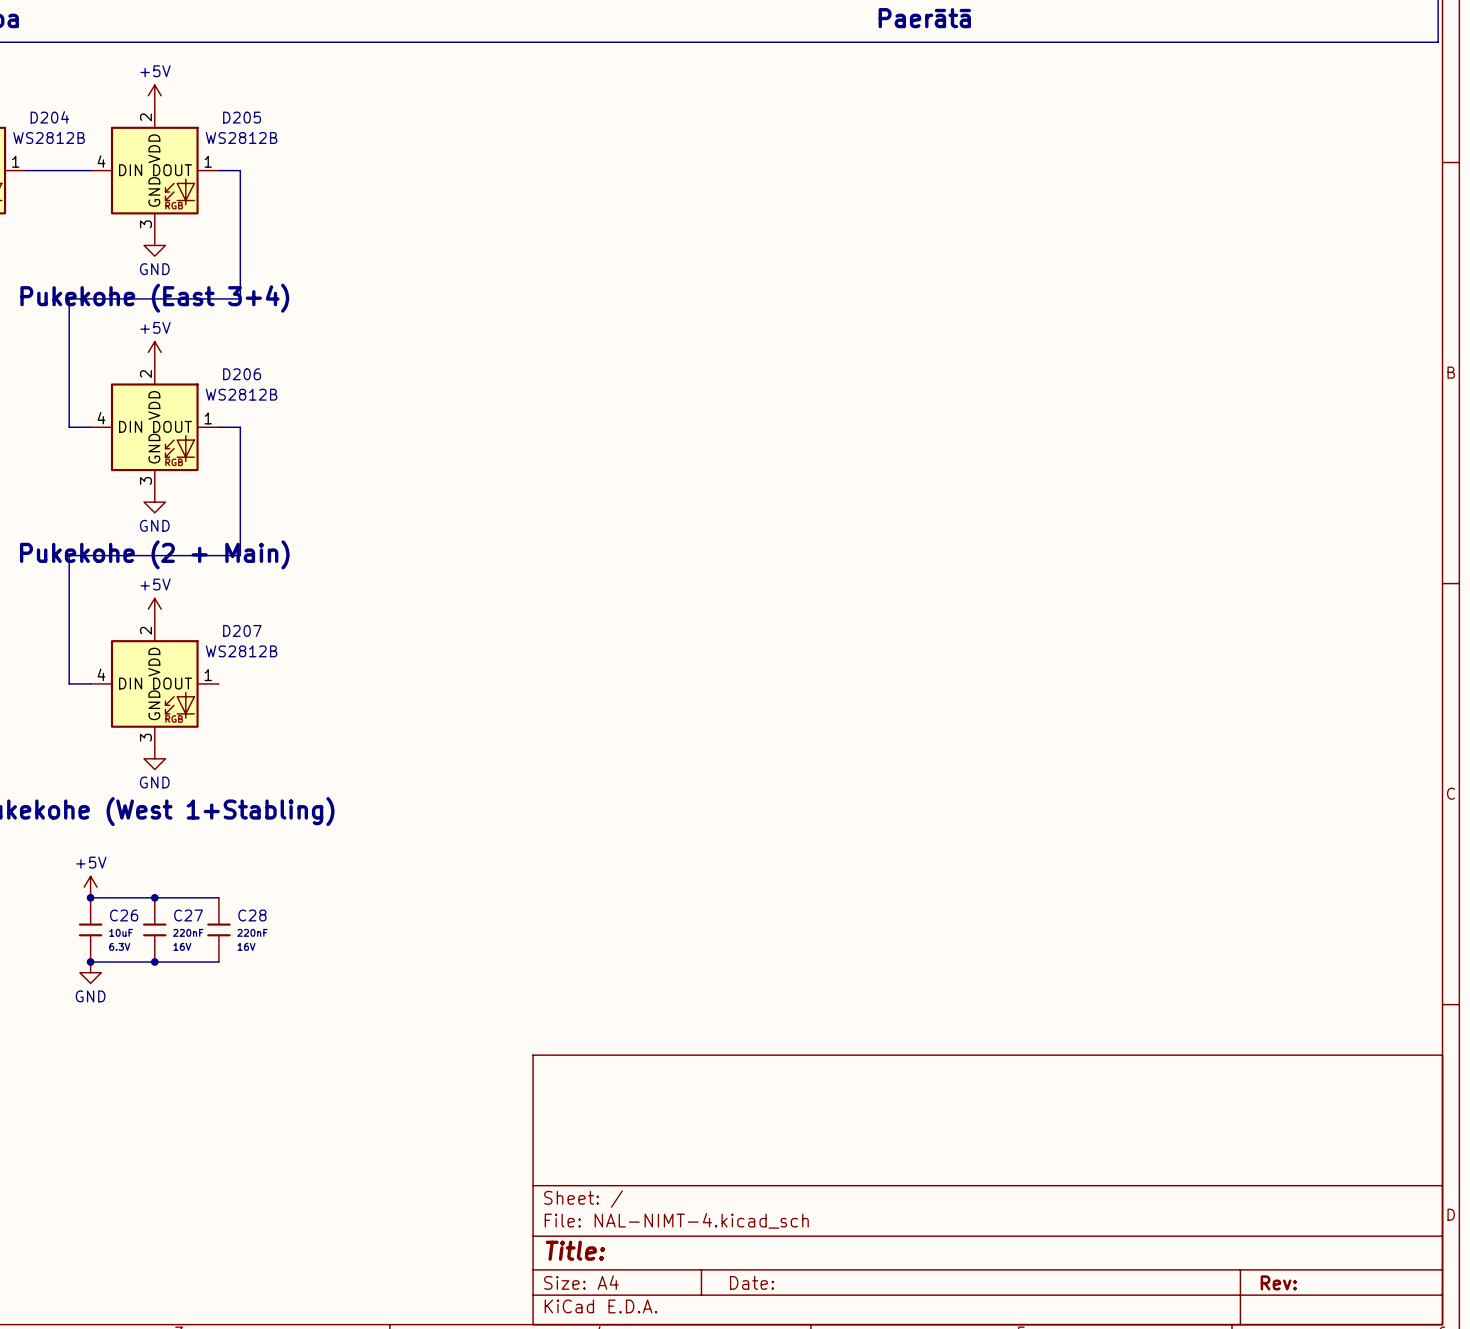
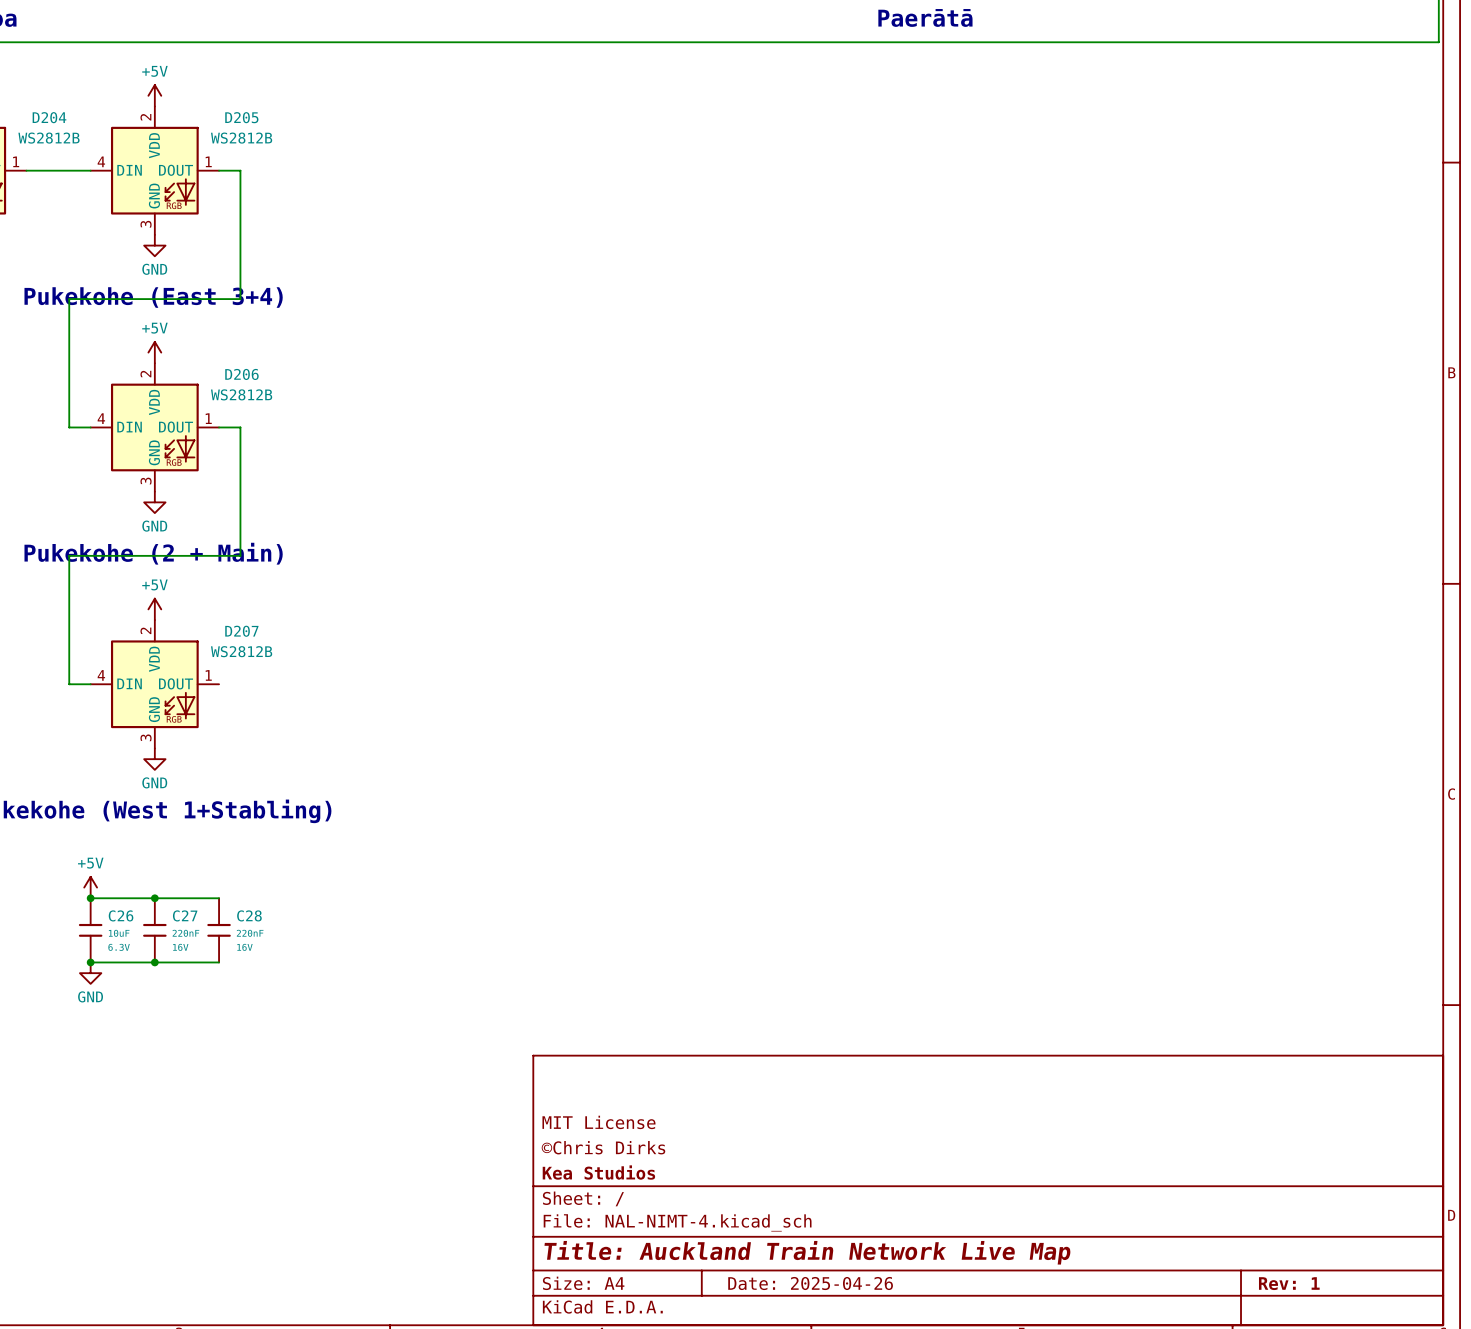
title block: none -> MIT License (598, 1122)
title block: none -> ©Chris Dirks (603, 1147)
title block: none -> Kea Studios (598, 1172)
title block: Title: (575, 1250) -> Title: Auckland Train Network Live Map (807, 1252)
title block: Date: (751, 1282) -> Date: 2025-04-26 (810, 1283)
title block: Rev: (1278, 1282) -> Rev: 1 (1289, 1283)

